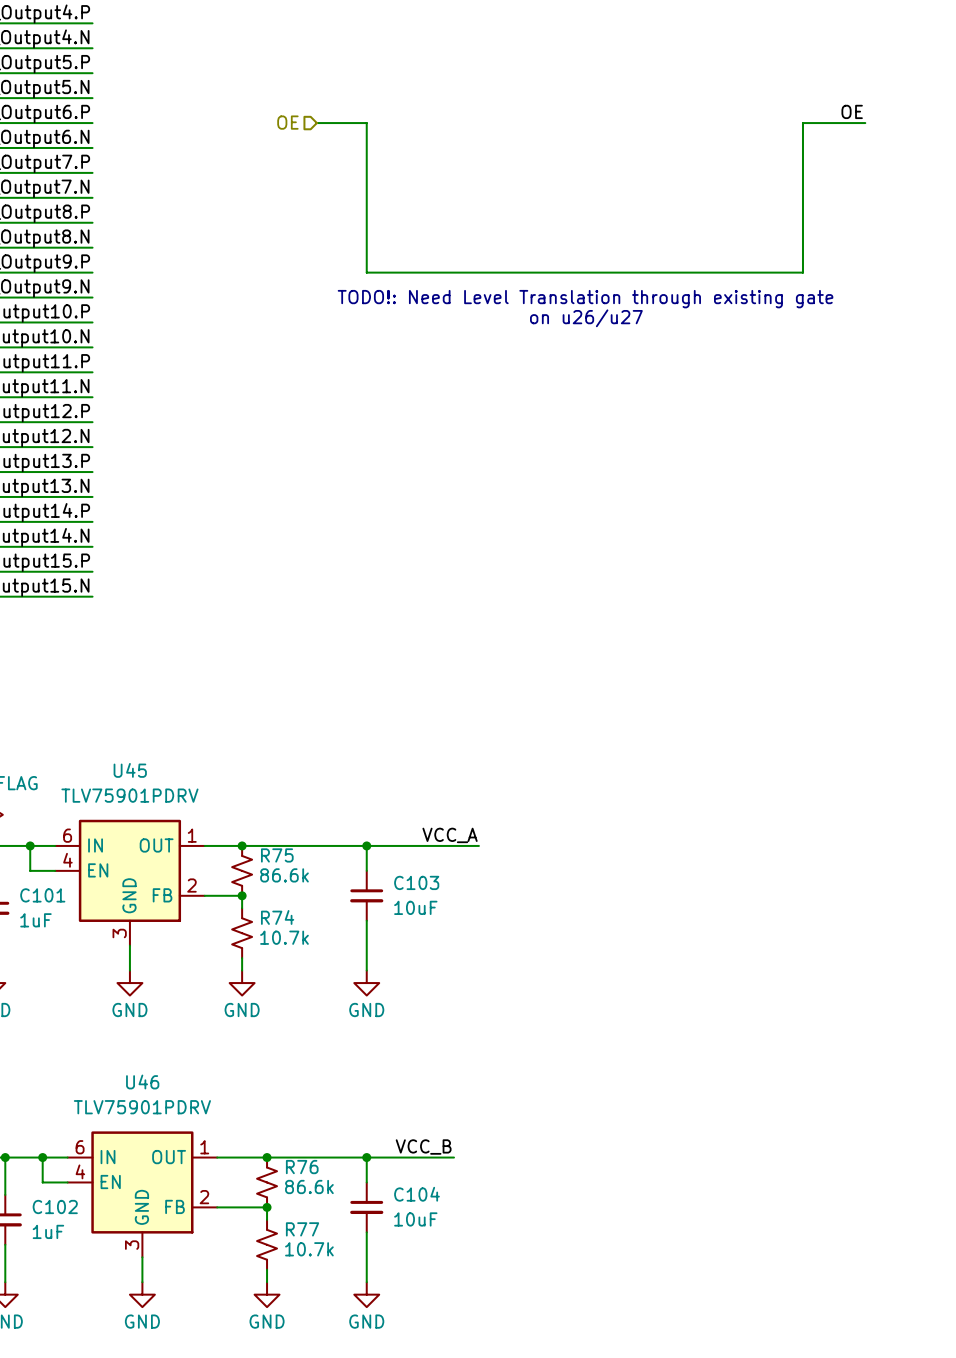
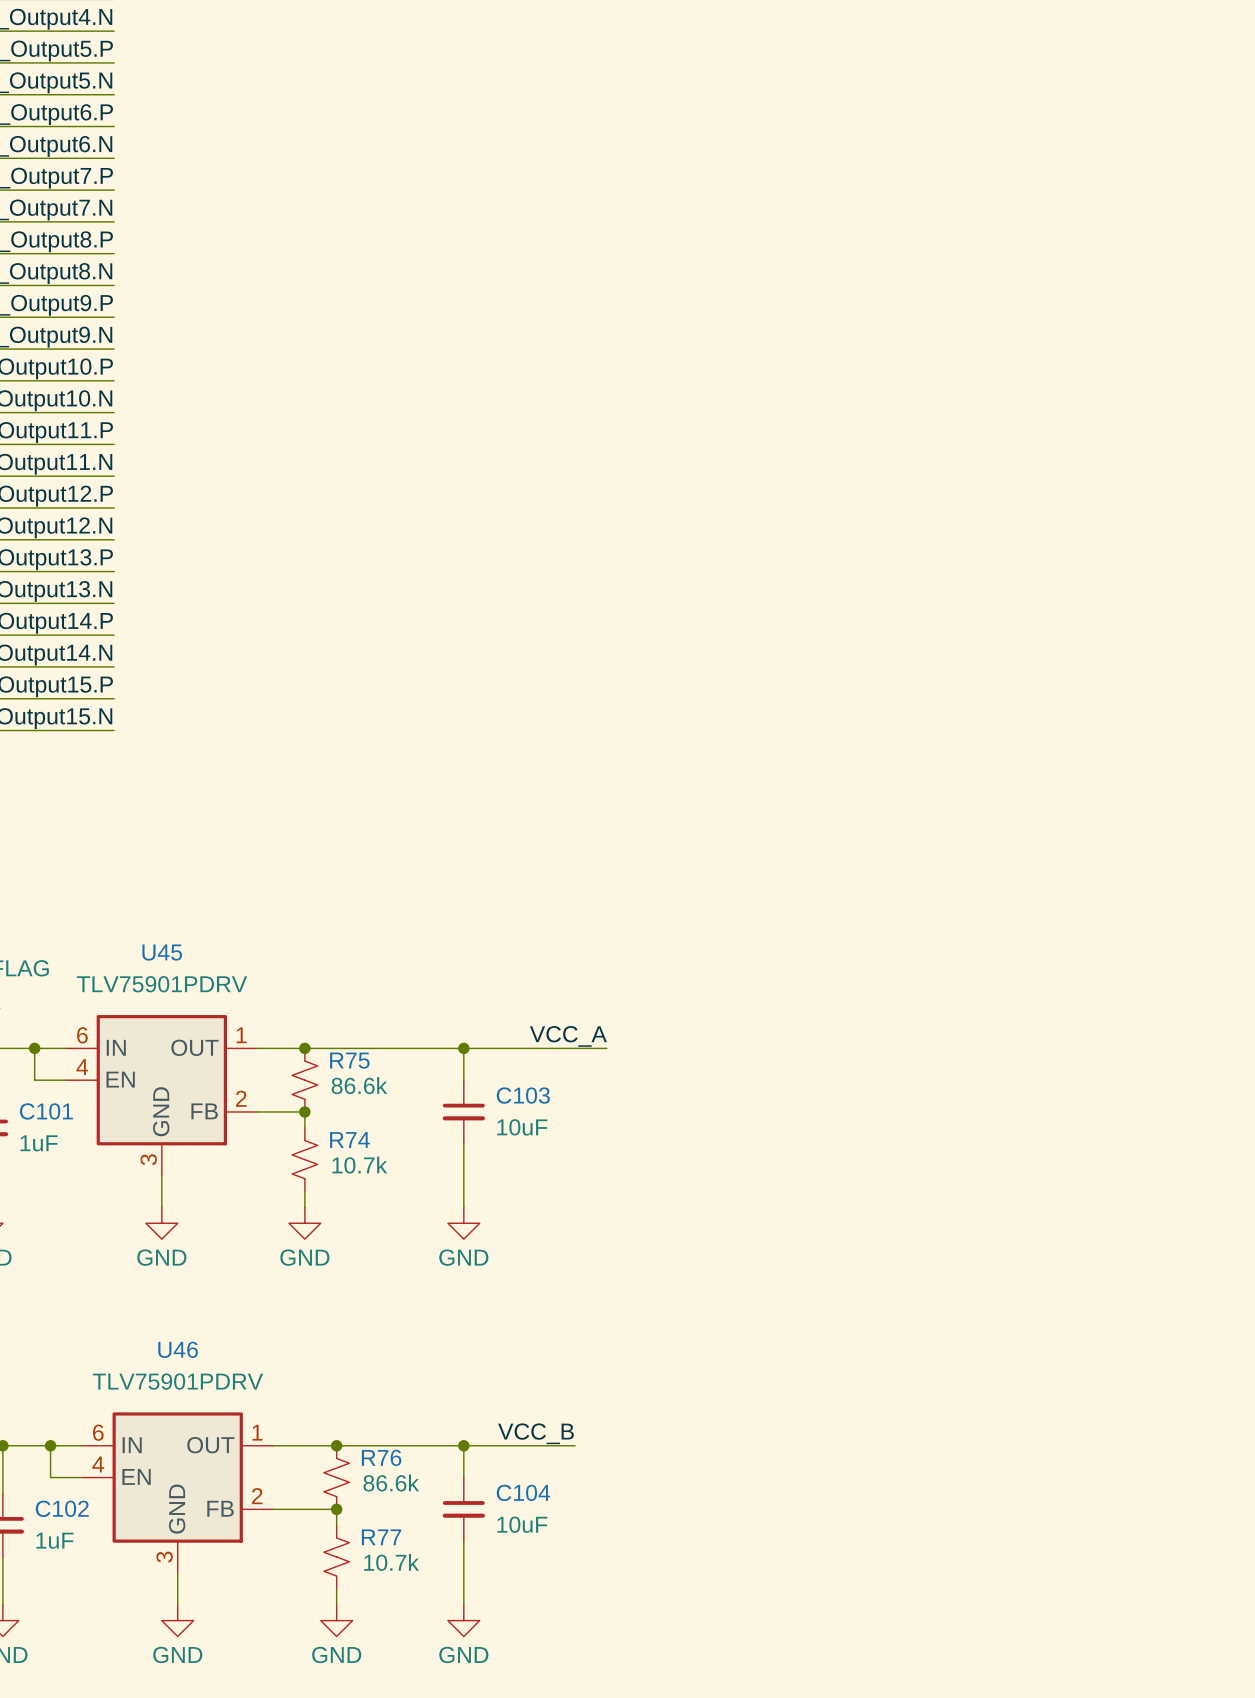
label: OE (852, 111) -> none
hierarchical label: OE (287, 122) -> none
wire: (316, 123) (366, 123) (366, 272) (802, 272) (802, 123) (865, 123) -> none
text: TODO!: Need Level Translation through existing gate (585, 299) -> none
text: on u26/u27 (586, 318) -> none

